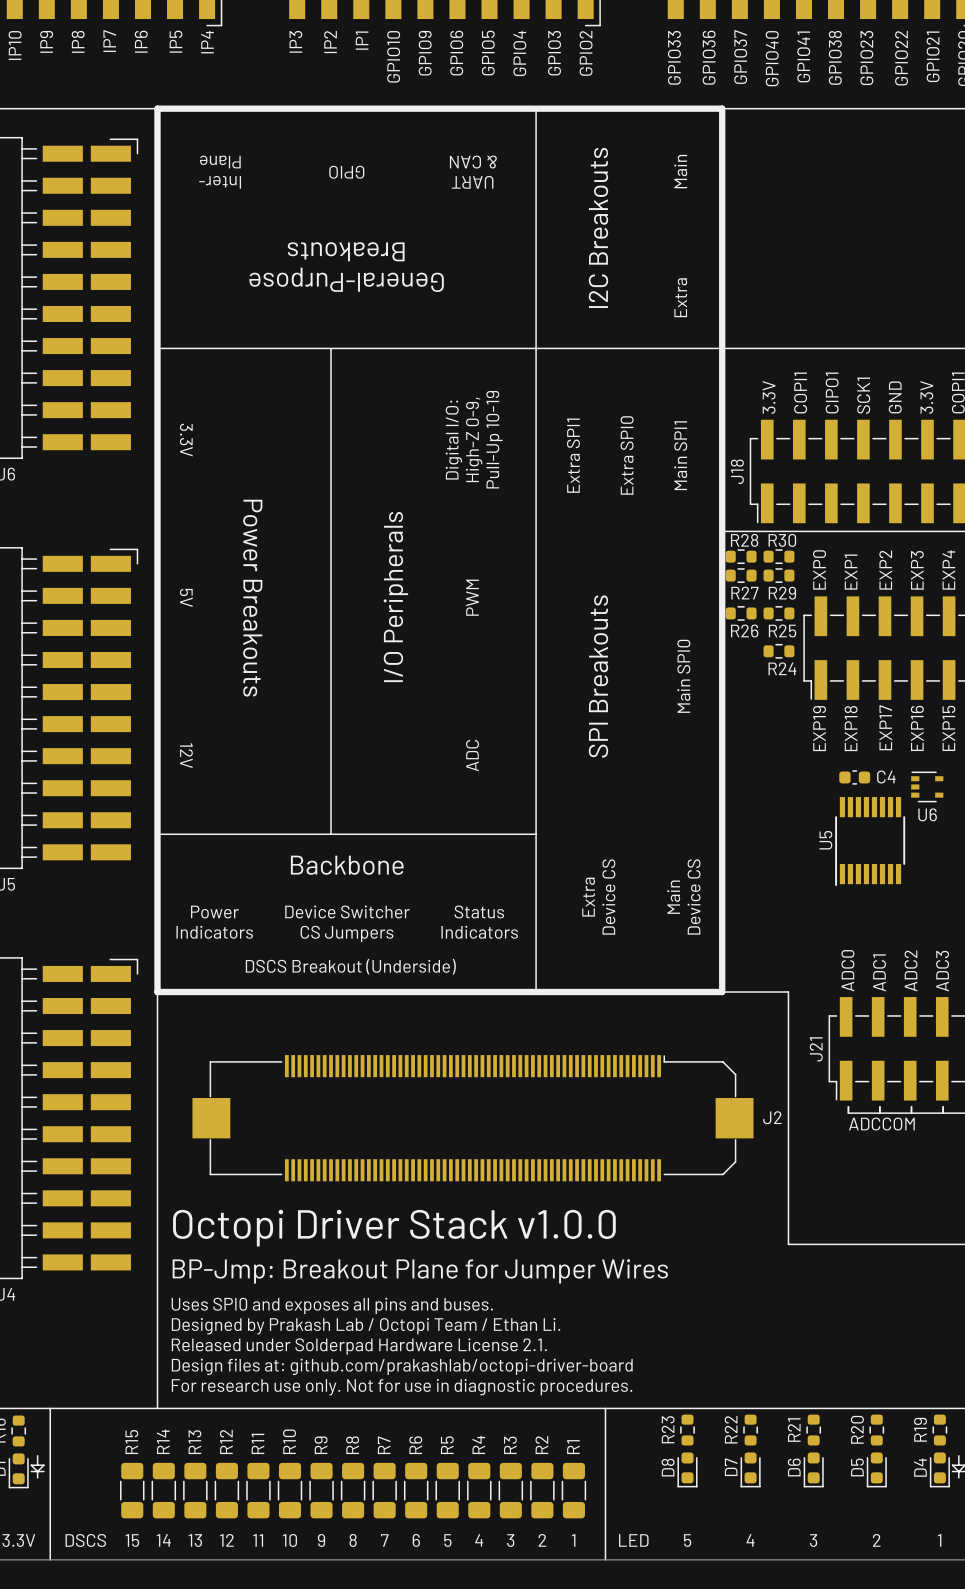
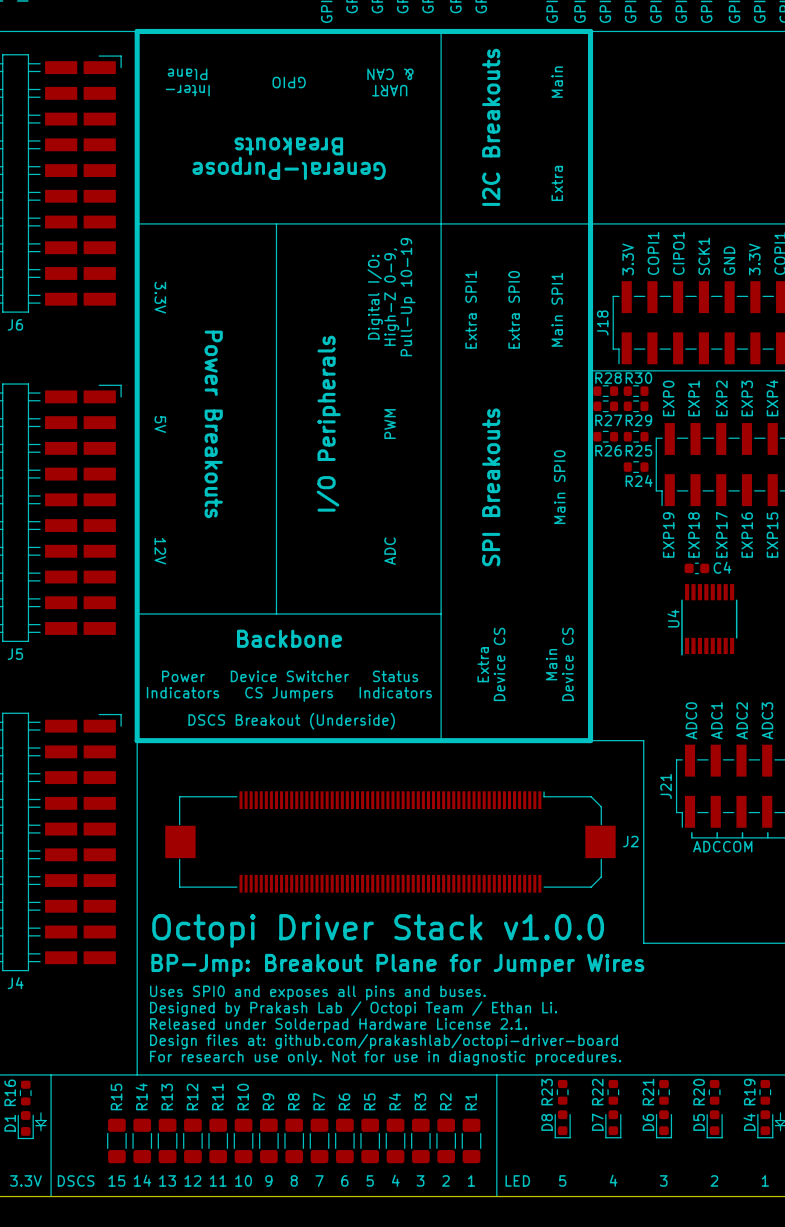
U6: (927, 786) -> none
U5 name: U5 (825, 840) -> U4 (673, 618)

